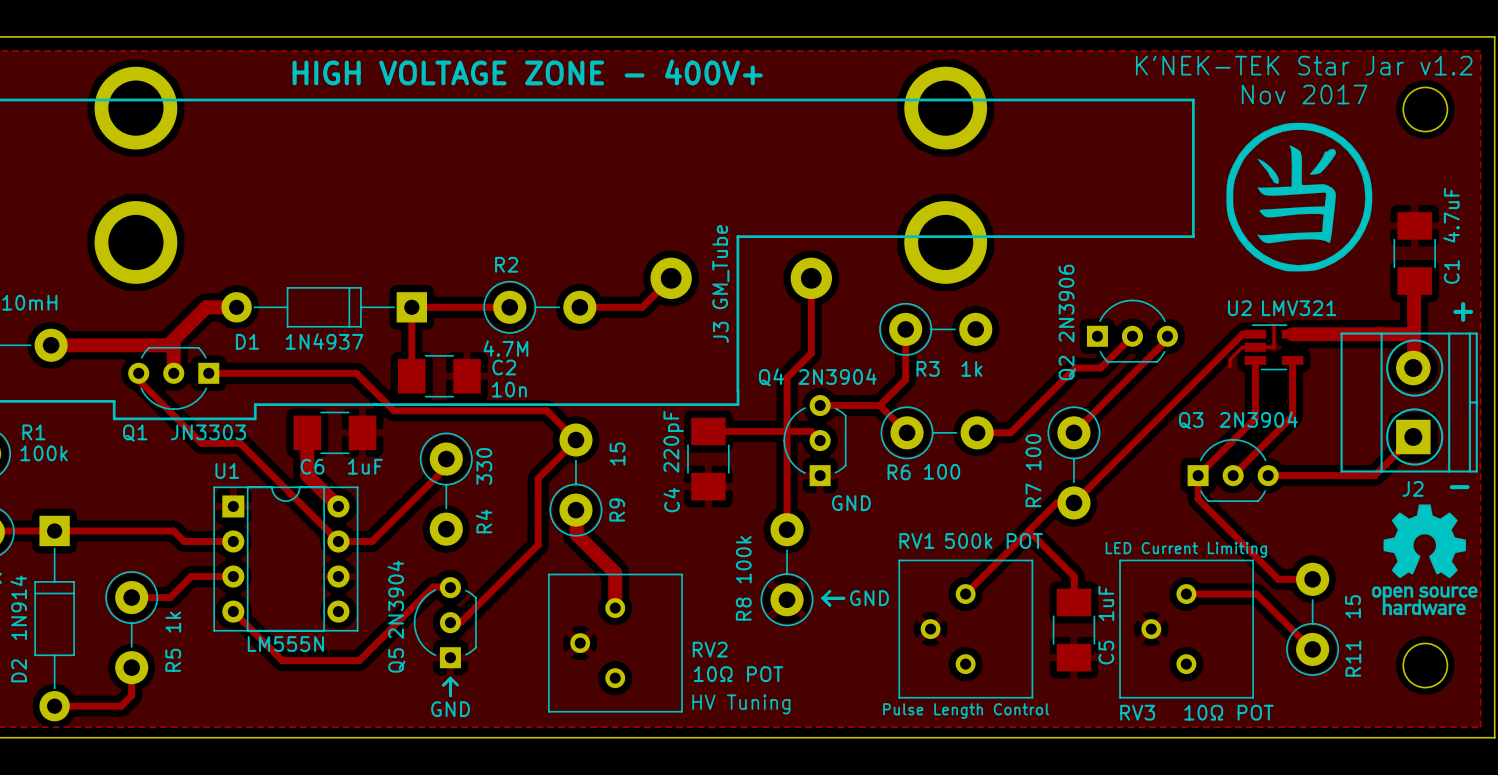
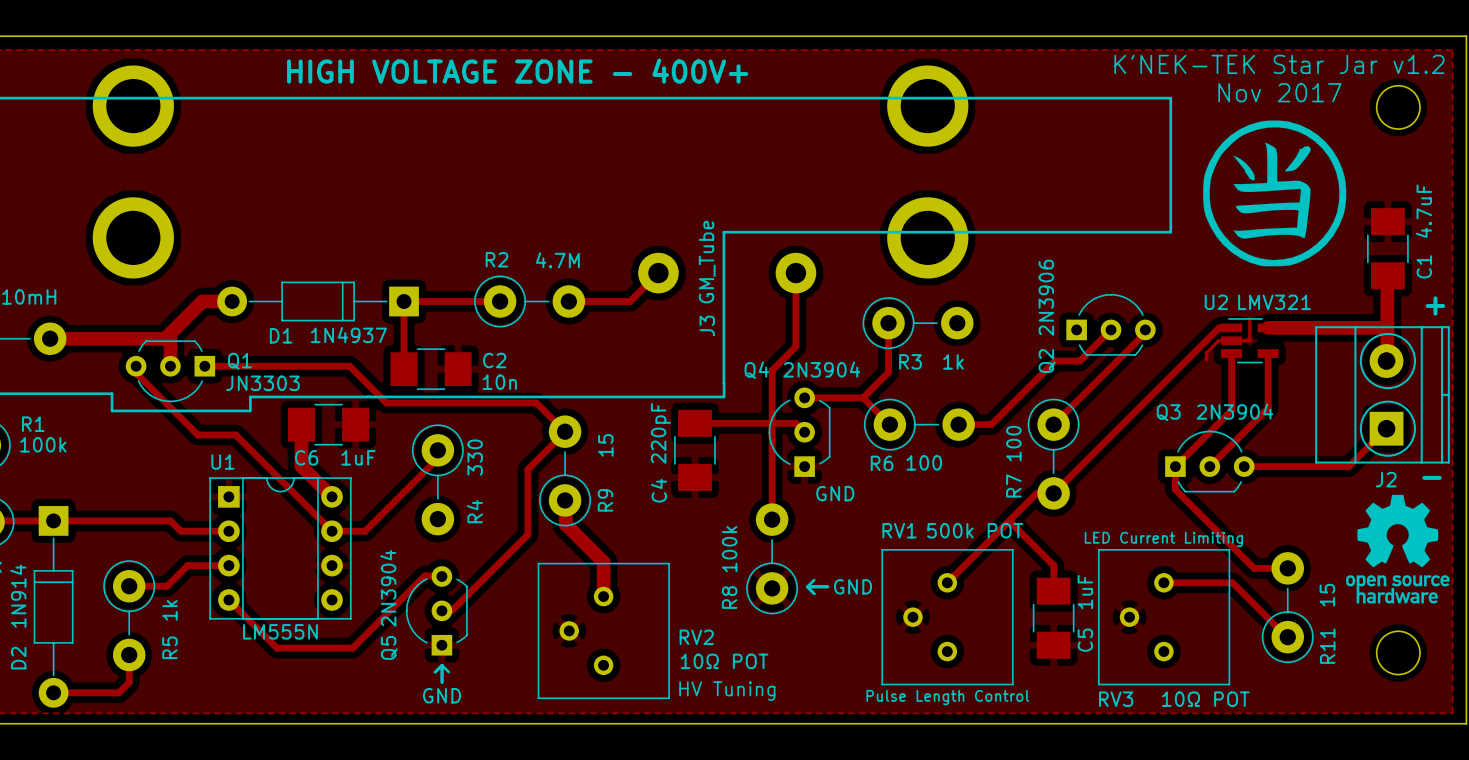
D1 name position: D1 (247, 341) -> D1 (281, 335)
D1 value position: 1N4937 (324, 341) -> 1N4937 (348, 335)
R2 value position: 4.7M (505, 348) -> 4.7M (557, 260)
Q1 value position: JN3303 (208, 432) -> JN3303 (262, 383)
Q1 name position: Q1 (135, 433) -> Q1 (239, 361)

